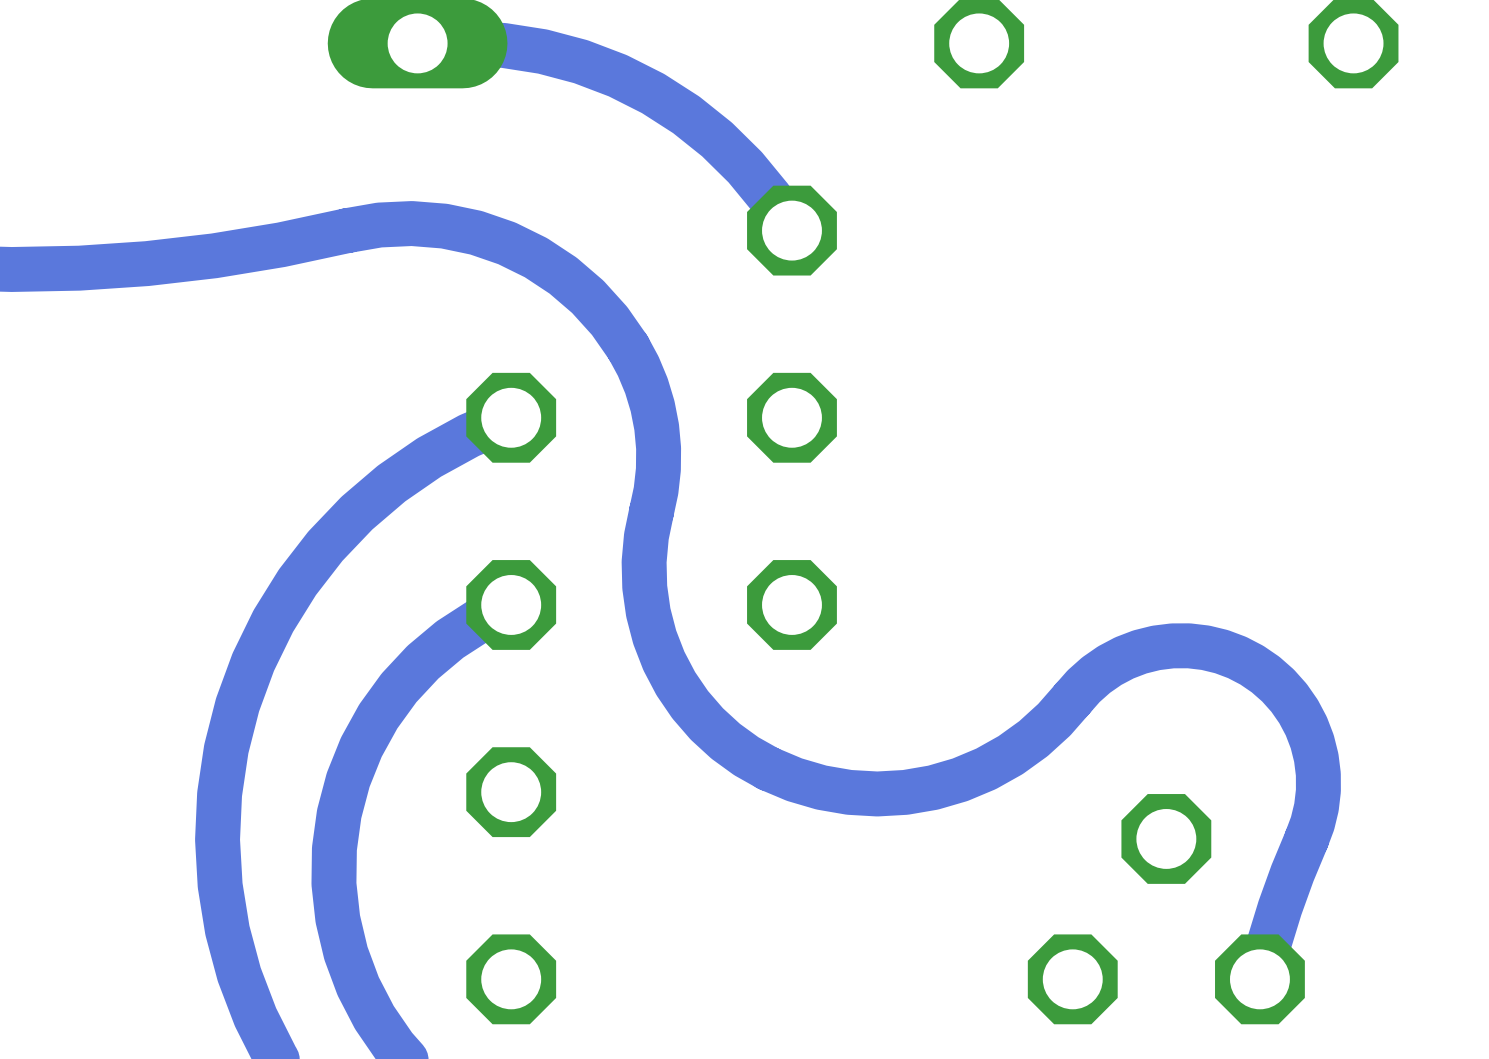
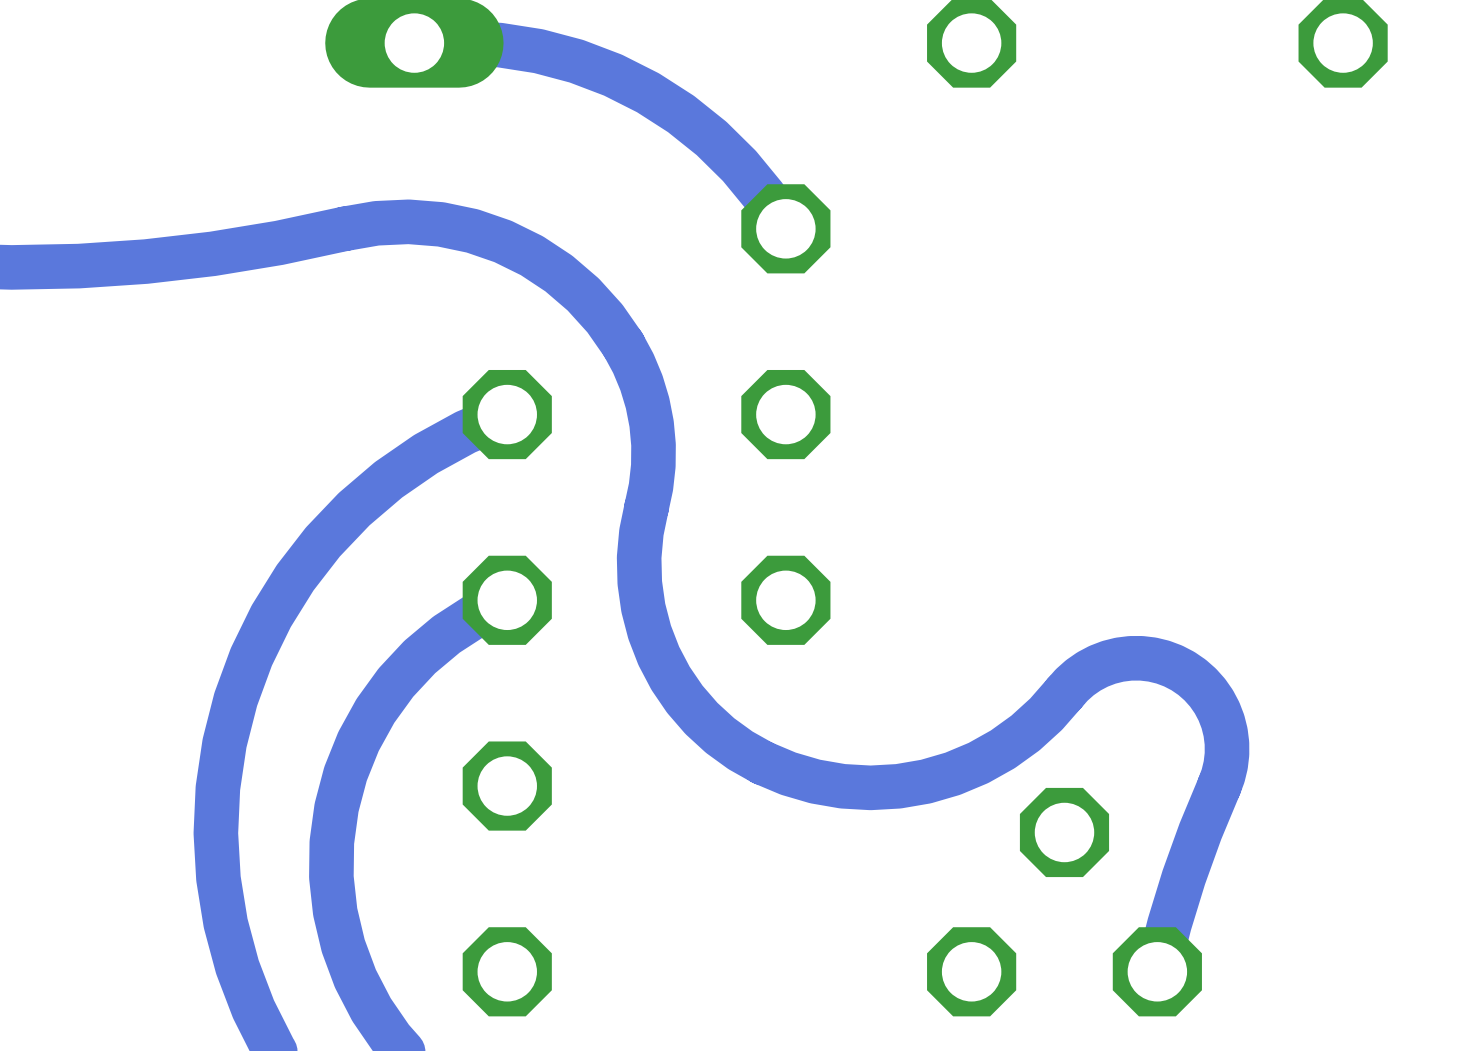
track: (1072, 698) (1096, 675) (1124, 657) (1156, 647) (1189, 645) (1221, 651) (1251, 665) (1278, 685) (1298, 711) (1306, 726) (1316, 757) (1318, 774) (1316, 807) (1312, 823) (1279, 908) (1259, 979) -> (1064, 693) (1088, 671) (1108, 662) (1130, 658) (1152, 659) (1173, 666) (1200, 684) (1213, 701) (1222, 721) (1227, 754) (1223, 775) (1183, 877) (1157, 971)
part position: (1166, 909) -> (1064, 902)

